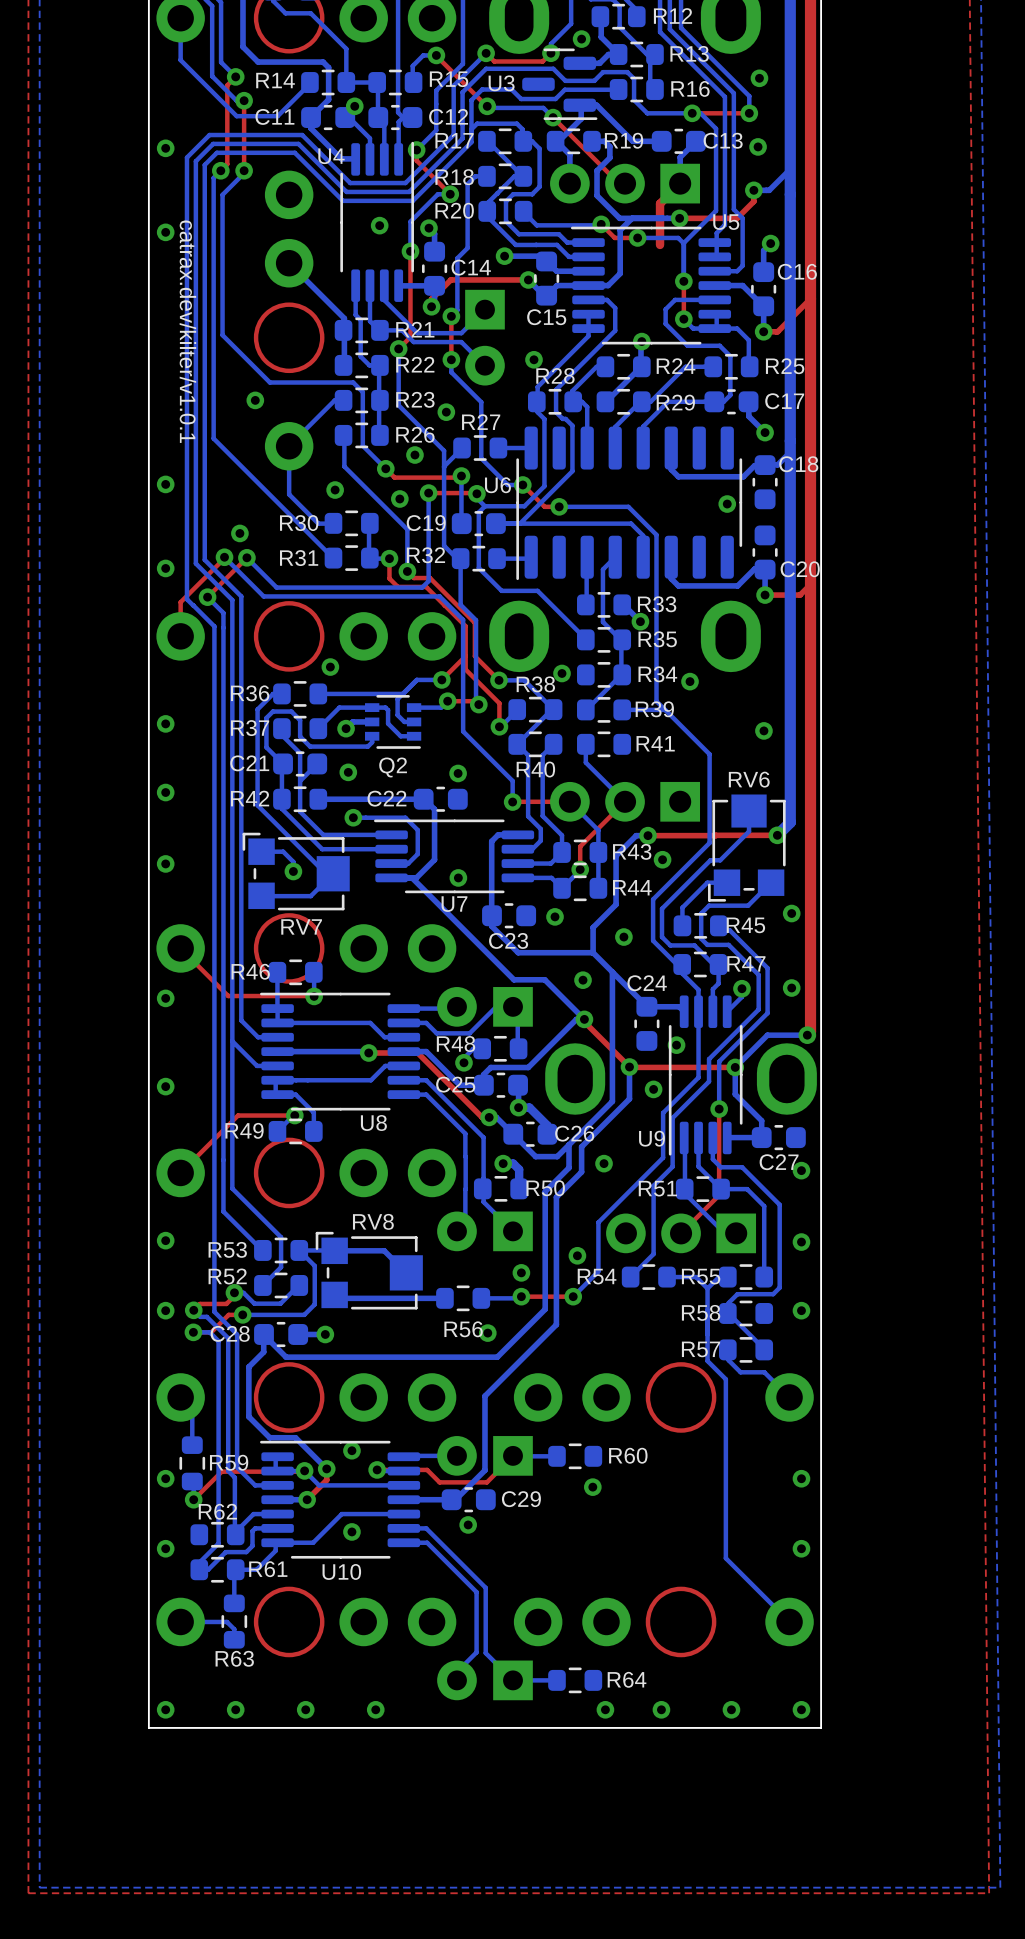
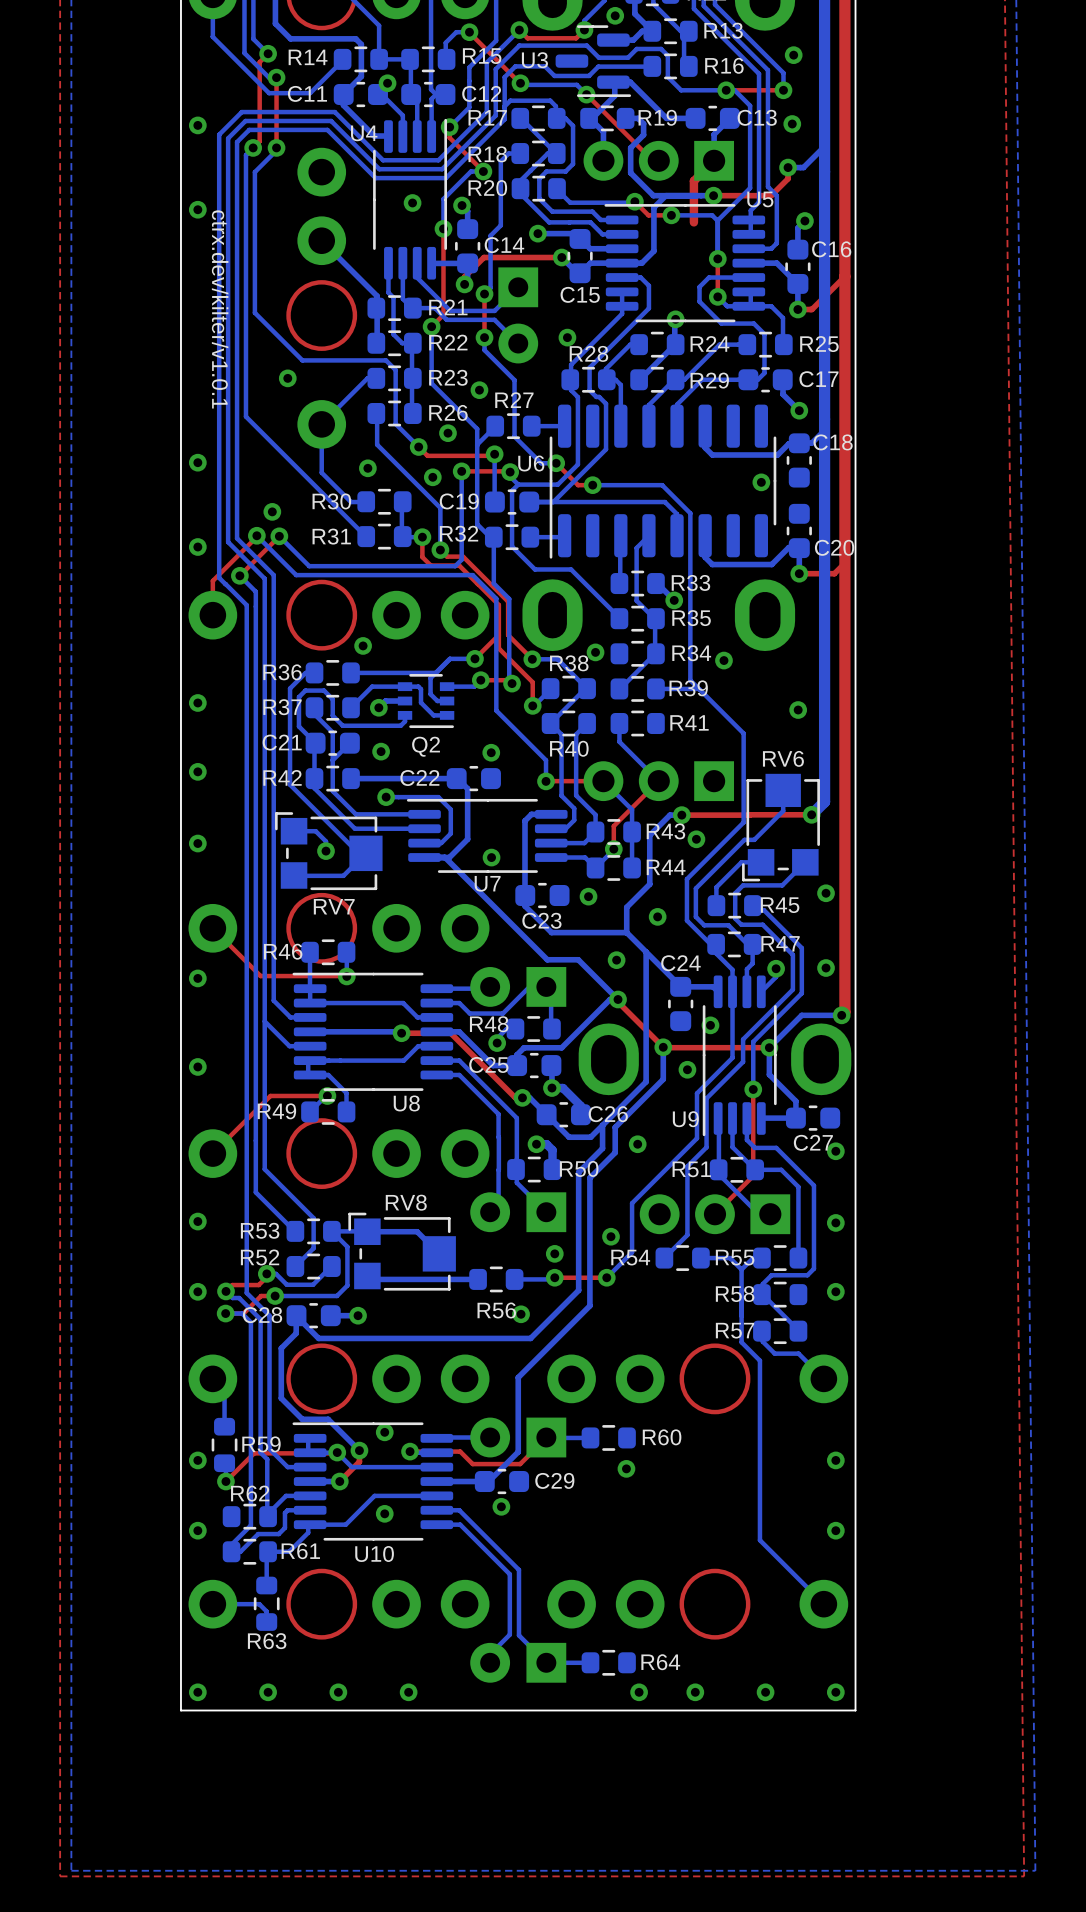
text: catrax.dev/kilter/v1.0.1 (187, 331) -> ctrx.dev/kilter/v1.0.1 (220, 309)

